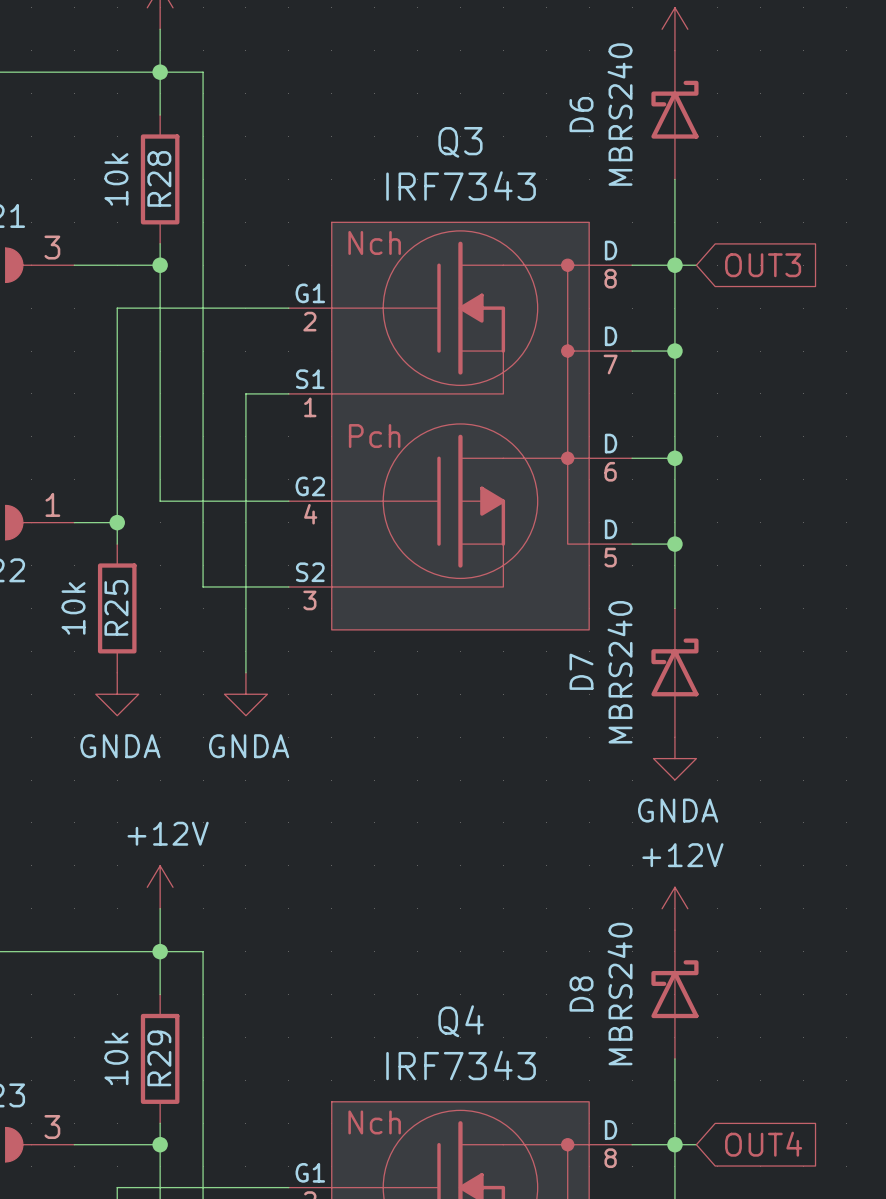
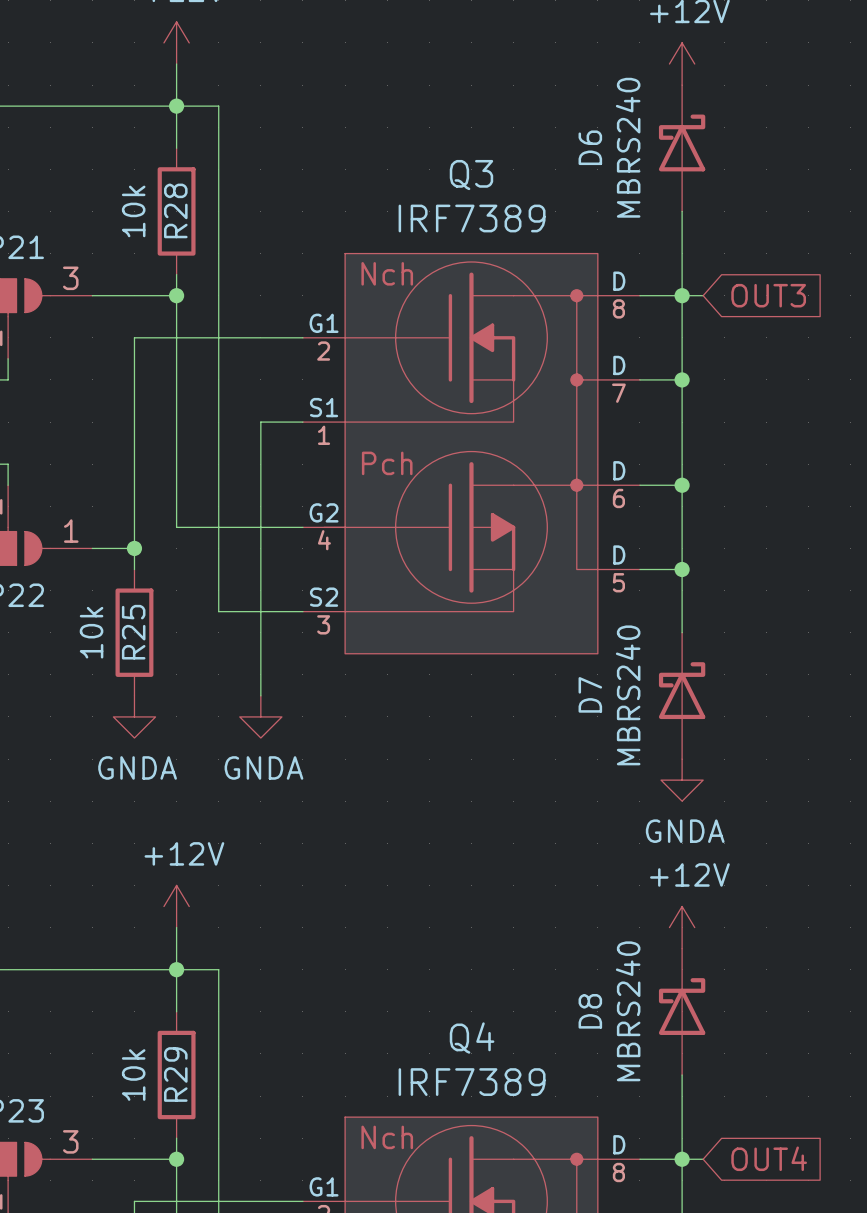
Q3 value: IRF7343 (461, 186) -> IRF7389 (472, 218)
Q4 value: IRF7343 (461, 1065) -> IRF7389 (472, 1082)

